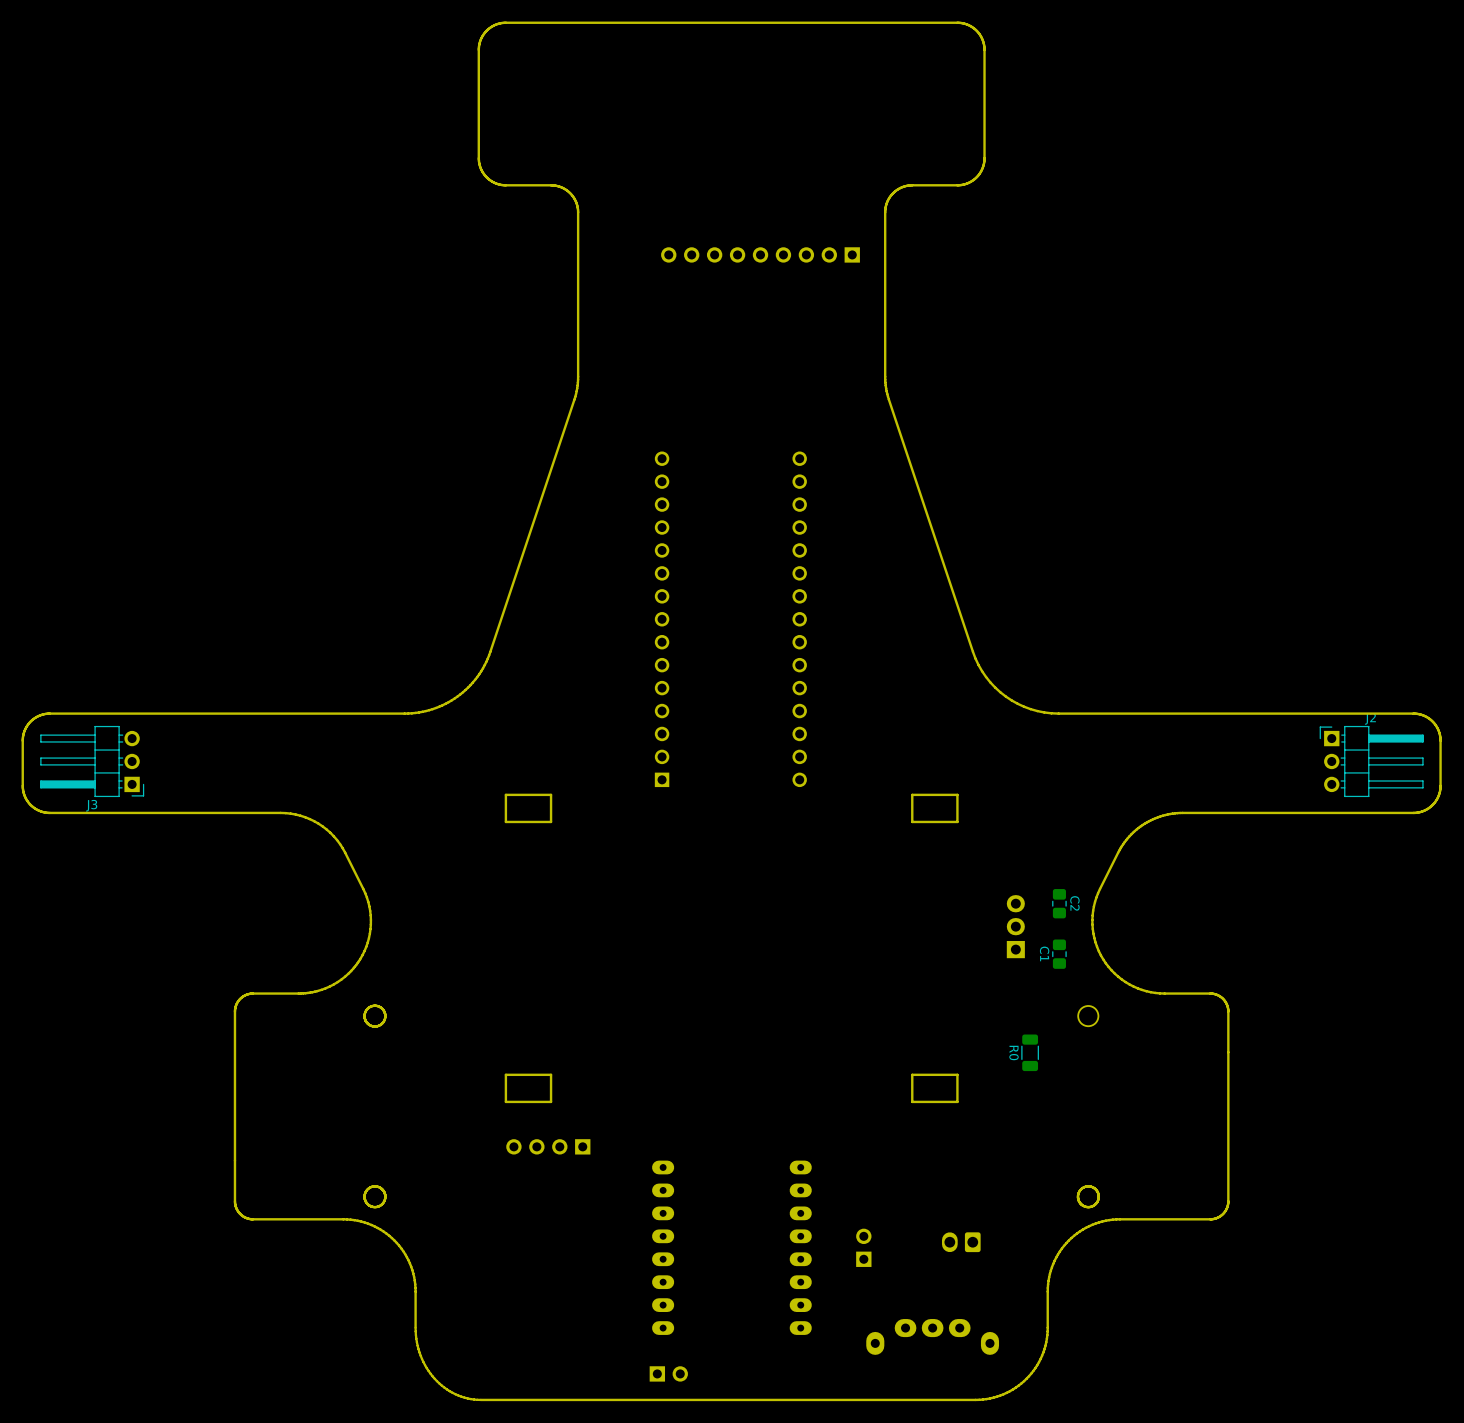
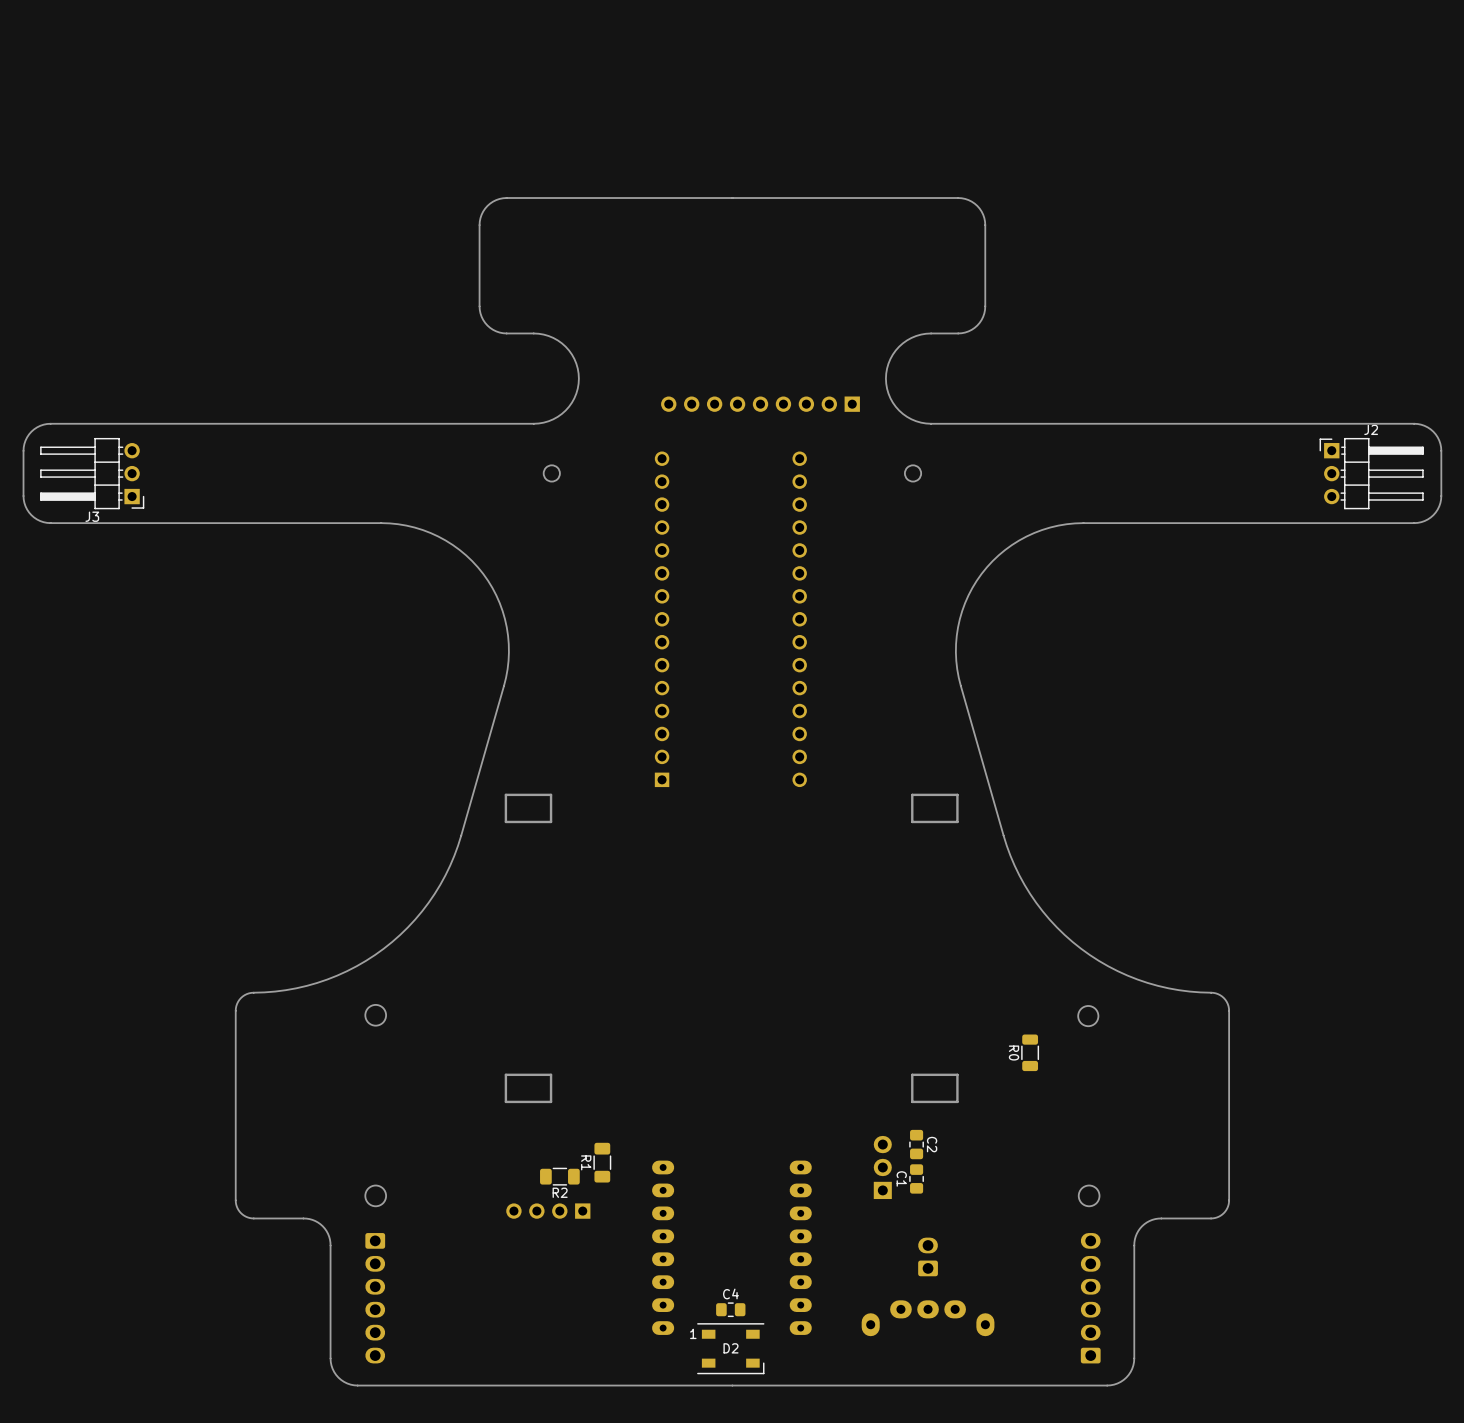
board edge: (958, 22) (505, 22) (489, 28) (482, 36) (478, 48) (479, 164) (485, 176) (496, 183) (556, 185) (568, 191) (575, 200) (578, 212) (578, 376) (574, 399) (490, 651) (479, 674) (468, 687) (451, 700) (432, 709) (415, 712) (48, 713) (33, 718) (24, 731) (23, 791) (29, 804) (40, 811) (49, 812) (290, 813) (305, 817) (318, 823) (330, 832) (340, 844) (365, 893) (370, 910) (368, 938) (358, 961) (341, 979) (321, 989) (303, 993) (249, 993) (240, 998) (235, 1006) (235, 1204) (240, 1214) (249, 1218) (350, 1219) (371, 1224) (389, 1235) (405, 1254) (413, 1273) (415, 1287) (415, 1335) (422, 1359) (428, 1370) (439, 1383) (461, 1396) (480, 1399) (975, 1399) (993, 1397) (1012, 1389) (1031, 1373) (1042, 1355) (1047, 1335) (1047, 1287) (1049, 1273) (1059, 1251) (1074, 1235) (1092, 1224) (1112, 1219) (1213, 1218) (1223, 1214) (1228, 1204) (1228, 1011) (1226, 1003) (1221, 997) (1213, 993) (1159, 993) (1133, 986) (1118, 976) (1108, 966) (1095, 942) (1092, 920) (1095, 901) (1124, 842) (1134, 831) (1146, 822) (1172, 813) (1414, 812) (1429, 807) (1438, 795) (1440, 785) (1439, 733) (1432, 721) (1420, 714) (1051, 713) (1030, 709) (1011, 700) (995, 687) (982, 671) (972, 651) (888, 399) (885, 379) (885, 212) (887, 200) (896, 190) (906, 185) (958, 185) (967, 183) (978, 175) (983, 163) (983, 44) (975, 29) (967, 24) (958, 22) -> (958, 198) (974, 203) (984, 218) (984, 313) (977, 325) (968, 331) (916, 336) (902, 343) (892, 354) (886, 373) (887, 388) (895, 406) (911, 419) (931, 423) (1414, 423) (1430, 429) (1440, 443) (1440, 503) (1433, 515) (1424, 521) (1414, 523) (1083, 523) (1058, 525) (1026, 536) (998, 555) (981, 573) (972, 587) (959, 619) (955, 652) (960, 685) (1006, 845) (1019, 875) (1036, 902) (1049, 919) (1072, 942) (1108, 966) (1127, 975) (1157, 985) (1179, 990) (1215, 993) (1223, 998) (1227, 1003) (1229, 1200) (1227, 1208) (1220, 1215) (1213, 1218) (1155, 1219) (1146, 1222) (1138, 1231) (1134, 1245) (1134, 1361) (1126, 1377) (1110, 1385) (357, 1385) (344, 1381) (334, 1371) (330, 1361) (330, 1245) (326, 1231) (317, 1222) (309, 1219) (247, 1217) (239, 1211) (236, 1204) (236, 1006) (241, 998) (249, 993) (285, 990) (306, 985) (337, 975) (356, 966) (375, 955) (400, 934) (415, 919) (434, 893) (445, 875) (458, 845) (506, 677) (508, 644) (502, 611) (488, 580) (466, 555) (438, 536) (406, 525) (381, 523) (50, 523) (40, 521) (29, 512) (23, 499) (23, 450) (27, 437) (37, 427) (50, 423) (543, 422) (557, 416) (571, 402) (577, 388) (577, 368) (569, 350) (553, 337) (538, 333) (499, 332) (490, 327) (483, 319) (479, 306) (479, 221) (485, 208) (493, 201) (506, 198) (958, 198)
part position: (760, 254) -> (760, 404)
round board edge: none -> [542, 464, 561, 483]
round board edge: none -> [904, 464, 923, 483]
J3 position: (92, 761) -> (92, 473)
J2 position: (1371, 761) -> (1371, 473)
C2 position: (1059, 903) -> (916, 1144)
part: (1015, 926) -> none
C1 position: (1059, 954) -> (916, 1178)
round board edge: none -> [364, 1003, 388, 1027]
board edge: (375, 1005) (368, 1008) (364, 1015) (367, 1022) (374, 1026) (381, 1023) (385, 1016) (382, 1009) (375, 1005) -> none
part position: (548, 1146) -> (548, 1211)
R1: none -> (602, 1162)
part: none -> (882, 1167)
R2: none -> (559, 1176)
round board edge: none -> [364, 1184, 388, 1208]
round board edge: none -> [1077, 1184, 1101, 1208]
board edge: (375, 1186) (382, 1189) (385, 1197) (381, 1204) (374, 1207) (367, 1203) (364, 1196) (368, 1188) (375, 1186) -> none
board edge: (1089, 1186) (1096, 1189) (1098, 1197) (1095, 1204) (1087, 1207) (1080, 1203) (1078, 1196) (1081, 1188) (1089, 1186) -> none
part rotation: 0° (961, 1242) -> 90° clockwise (928, 1256)
part position: (961, 1242) -> (928, 1256)
part: (863, 1247) -> none
part: none -> (375, 1298)
part: none -> (1090, 1298)
C4: none -> (730, 1309)
part position: (932, 1336) -> (928, 1318)
D2: none -> (730, 1348)
part: (668, 1373) -> none

